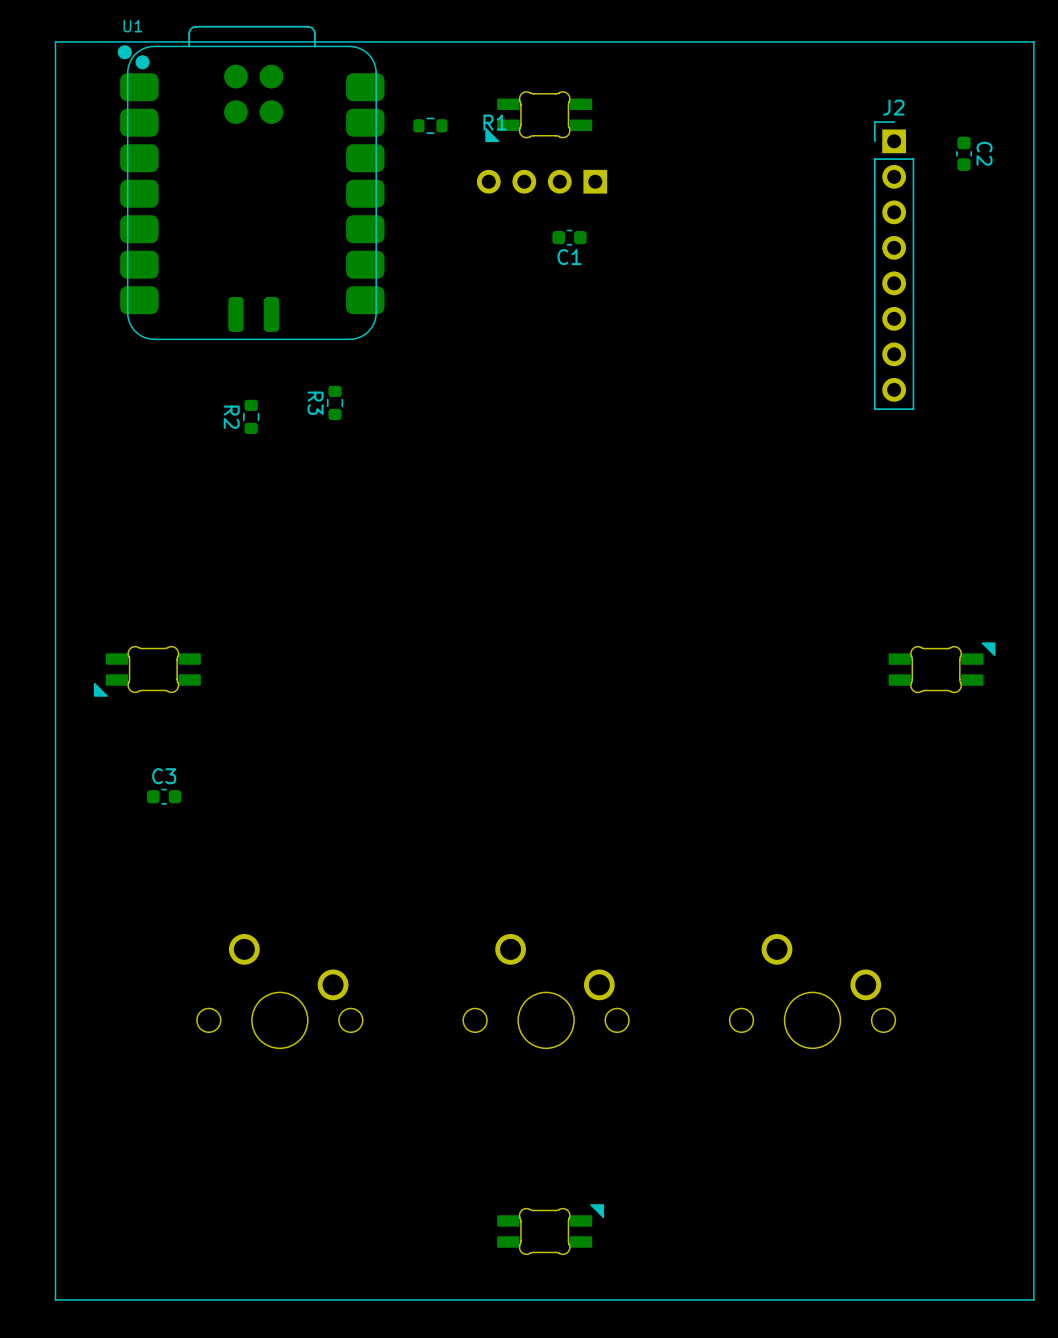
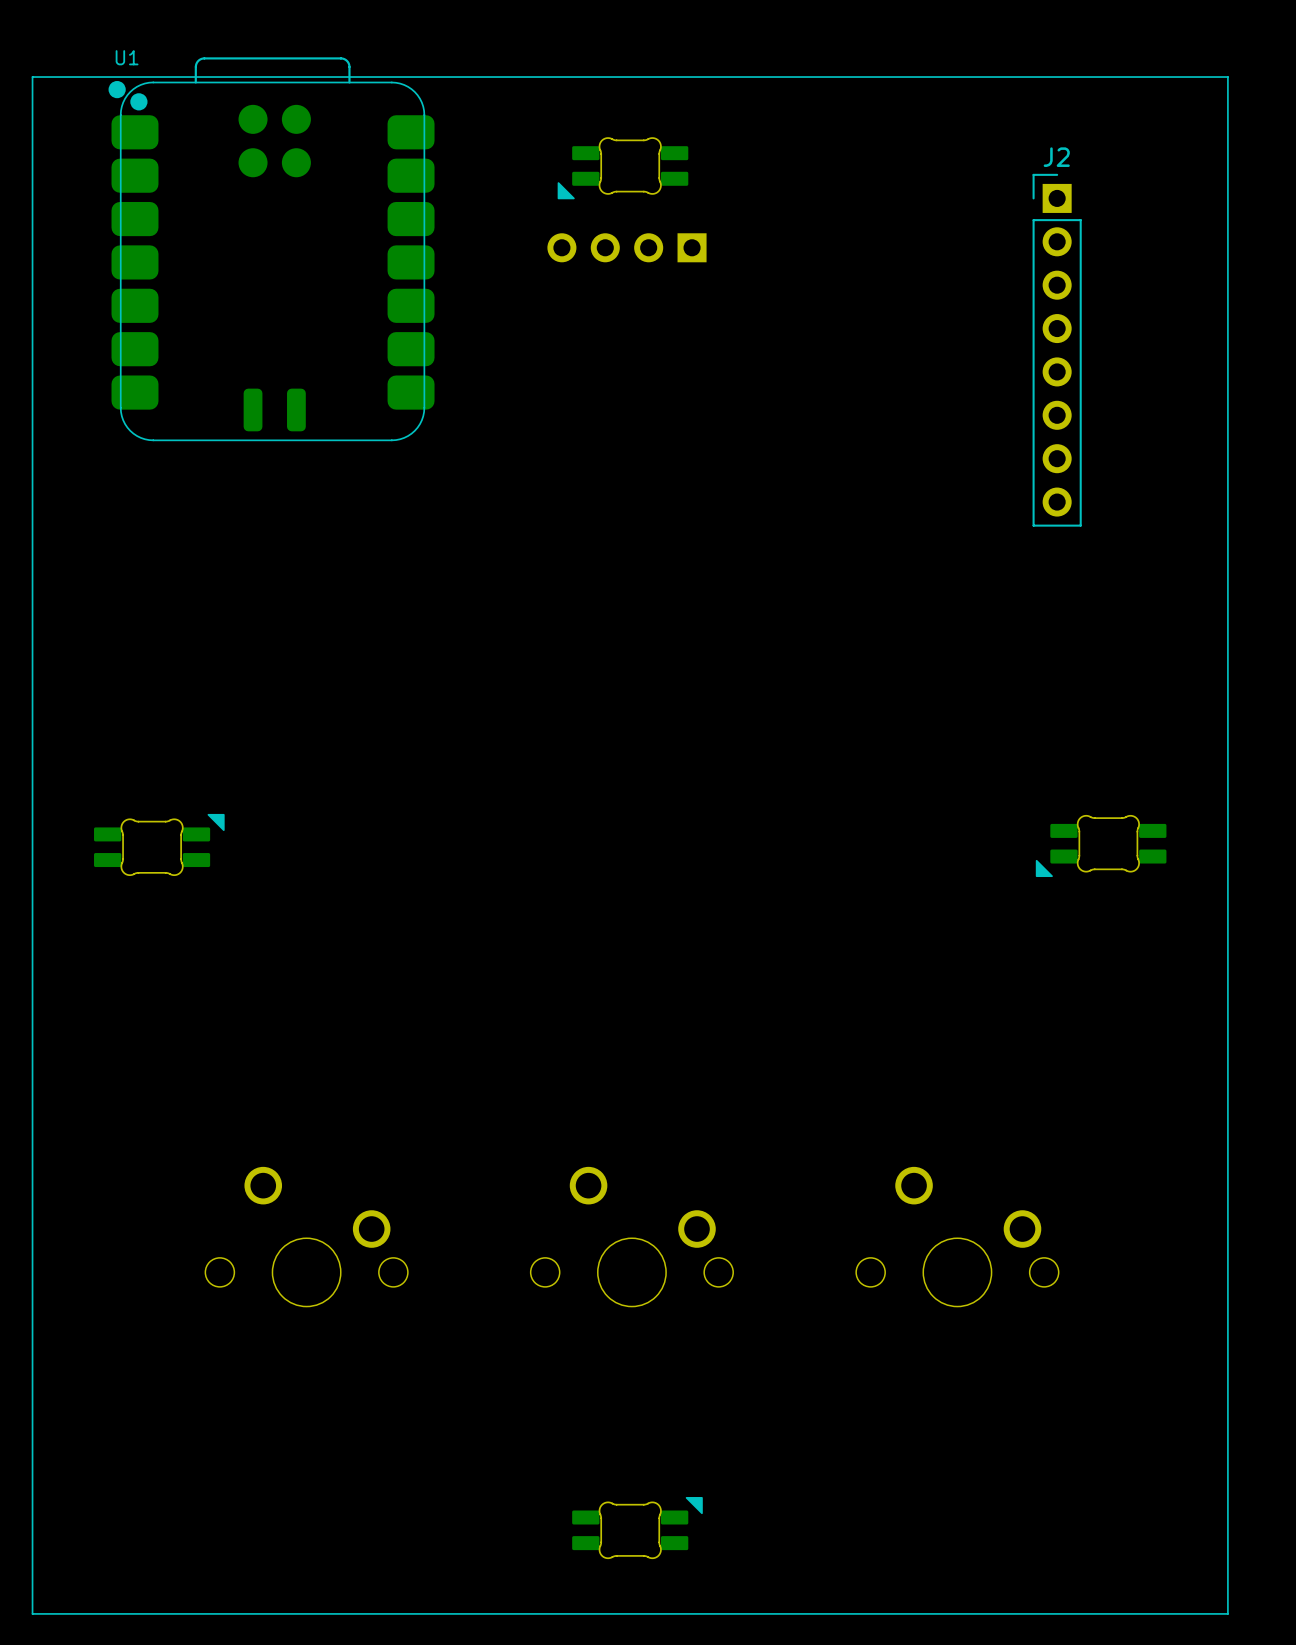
R1: (430, 125) -> none
C2: (964, 153) -> none
C1: (569, 237) -> none
R3: (335, 402) -> none
R2: (251, 416) -> none
part rotation: 0° (942, 667) -> 180° (1101, 845)
part rotation: 0° (147, 671) -> 180° (159, 844)
C3: (164, 796) -> none

